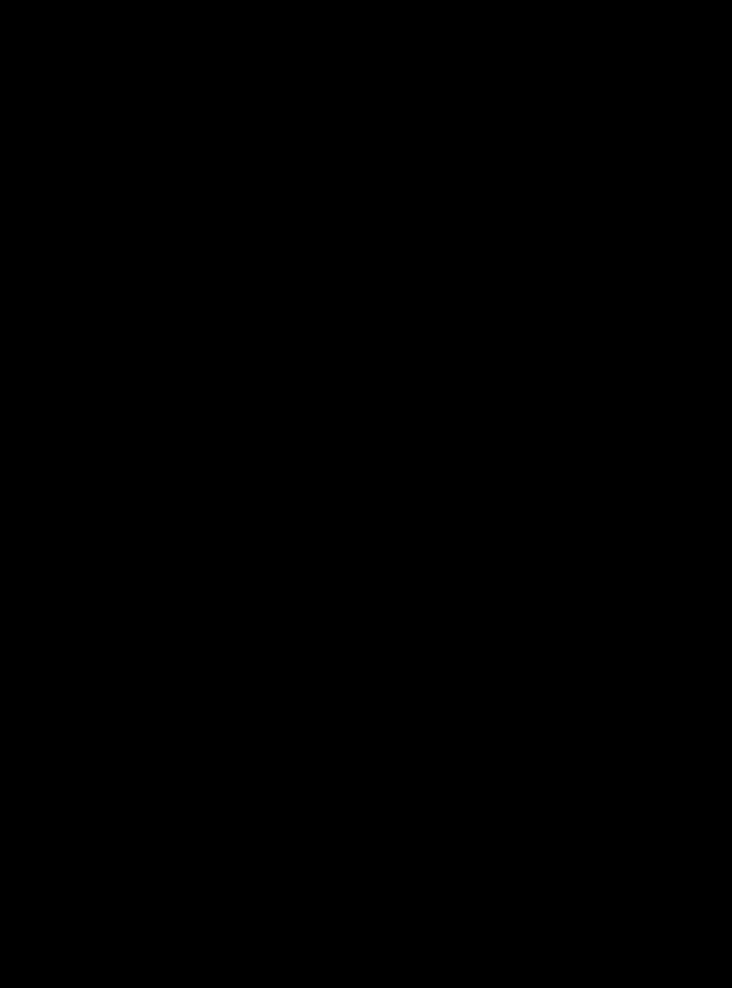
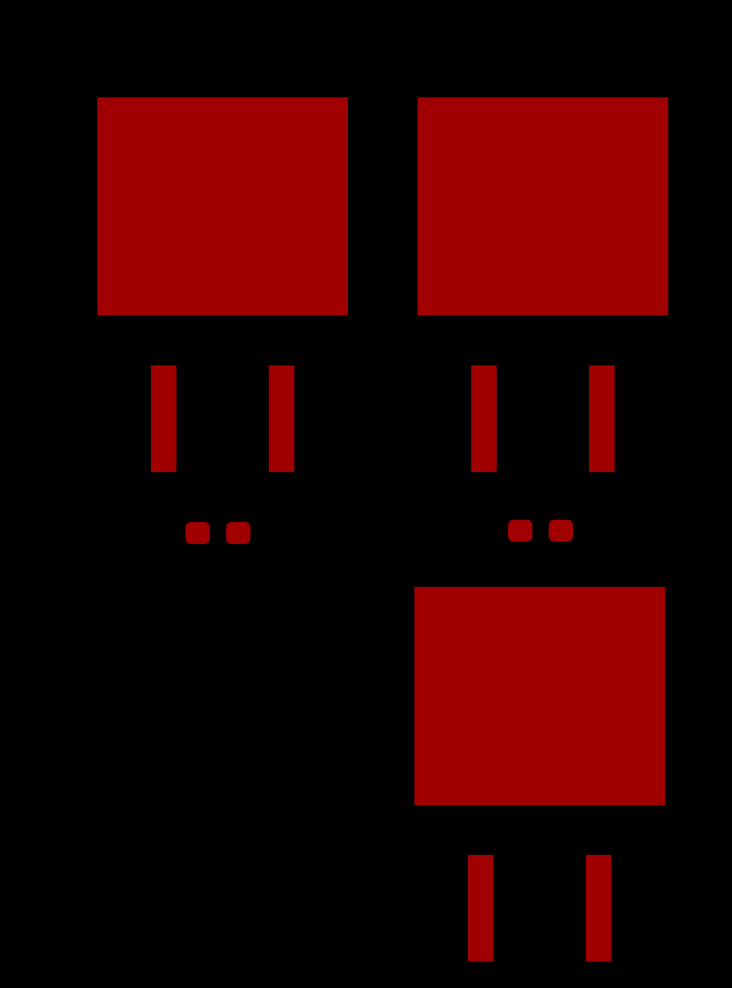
part: none -> (222, 284)
part: none -> (542, 284)
part: none -> (540, 530)
part: none -> (217, 533)
part: none -> (539, 774)

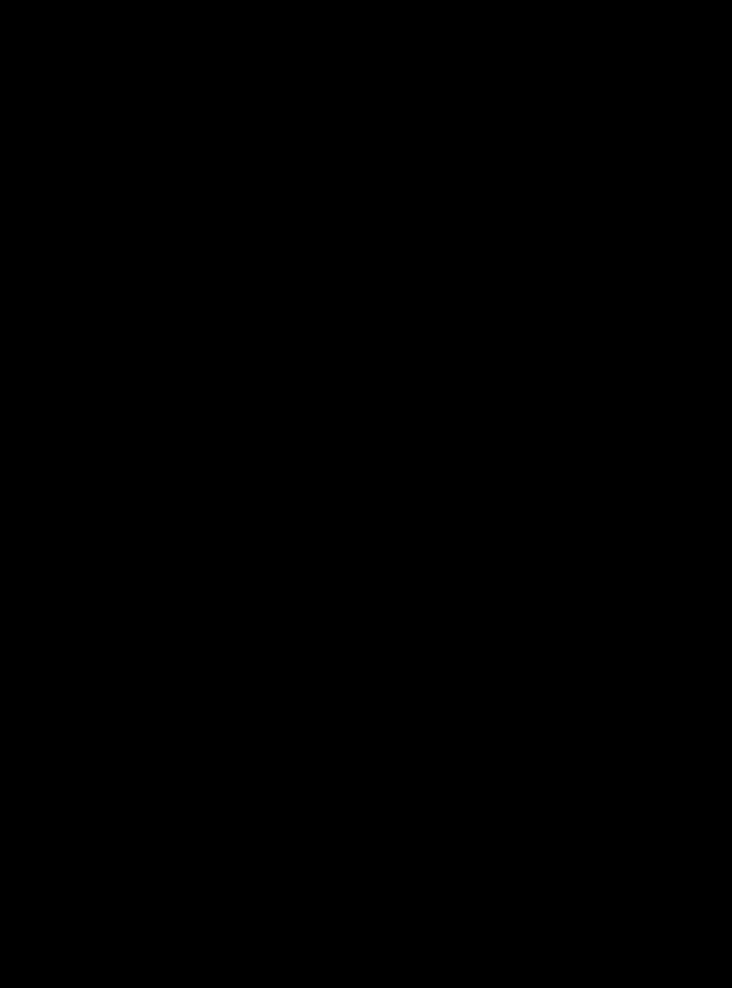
part: (222, 284) -> none
part: (542, 284) -> none
part: (540, 530) -> none
part: (217, 533) -> none
part: (539, 774) -> none

